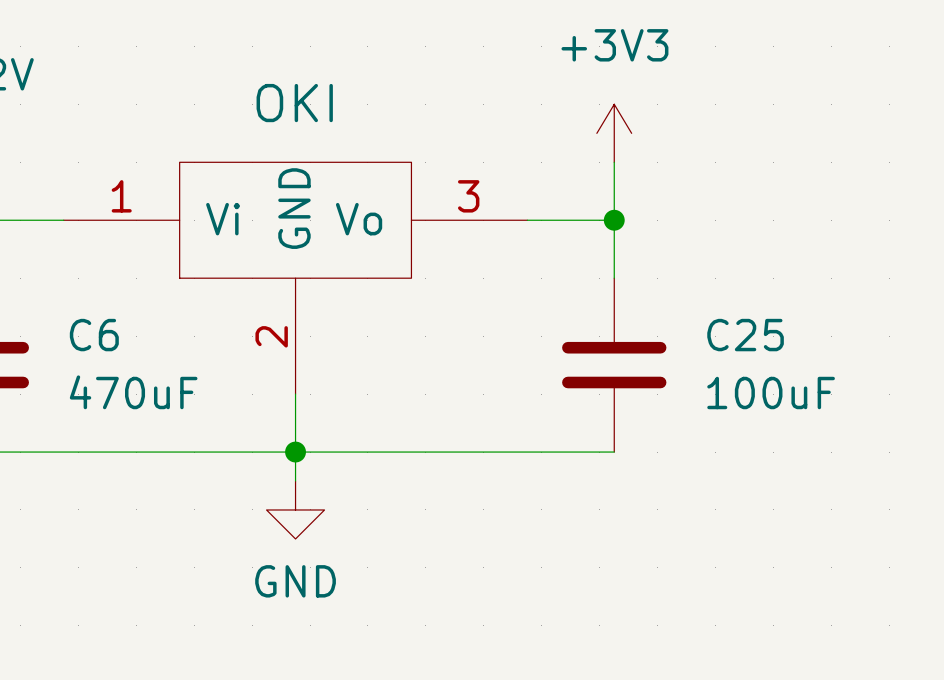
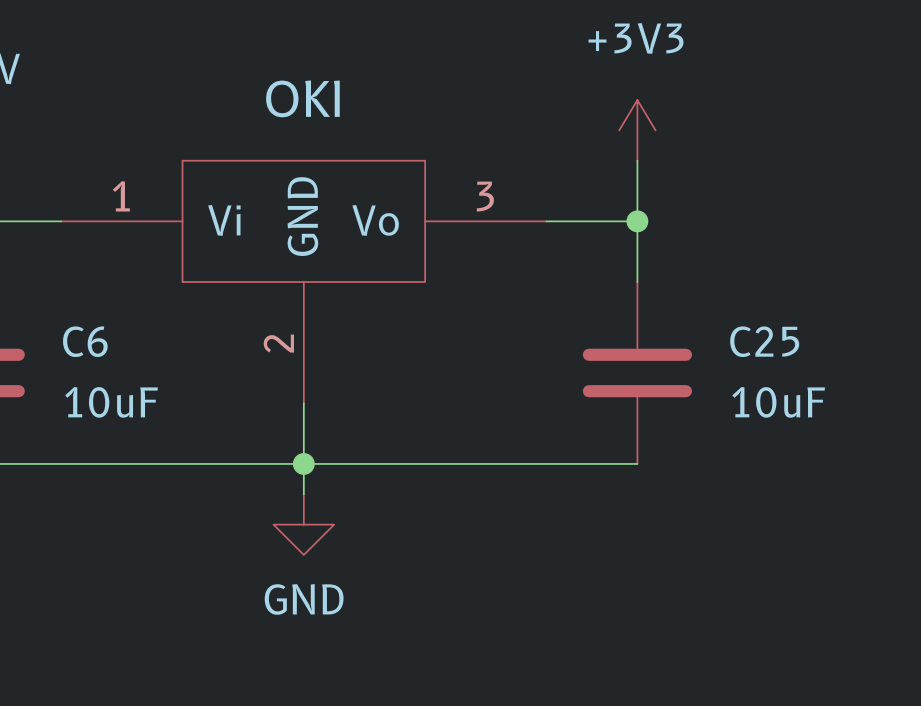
C6 value: 470uF (133, 392) -> 10uF (111, 402)
C25 value: 100uF (771, 393) -> 10uF (778, 402)

